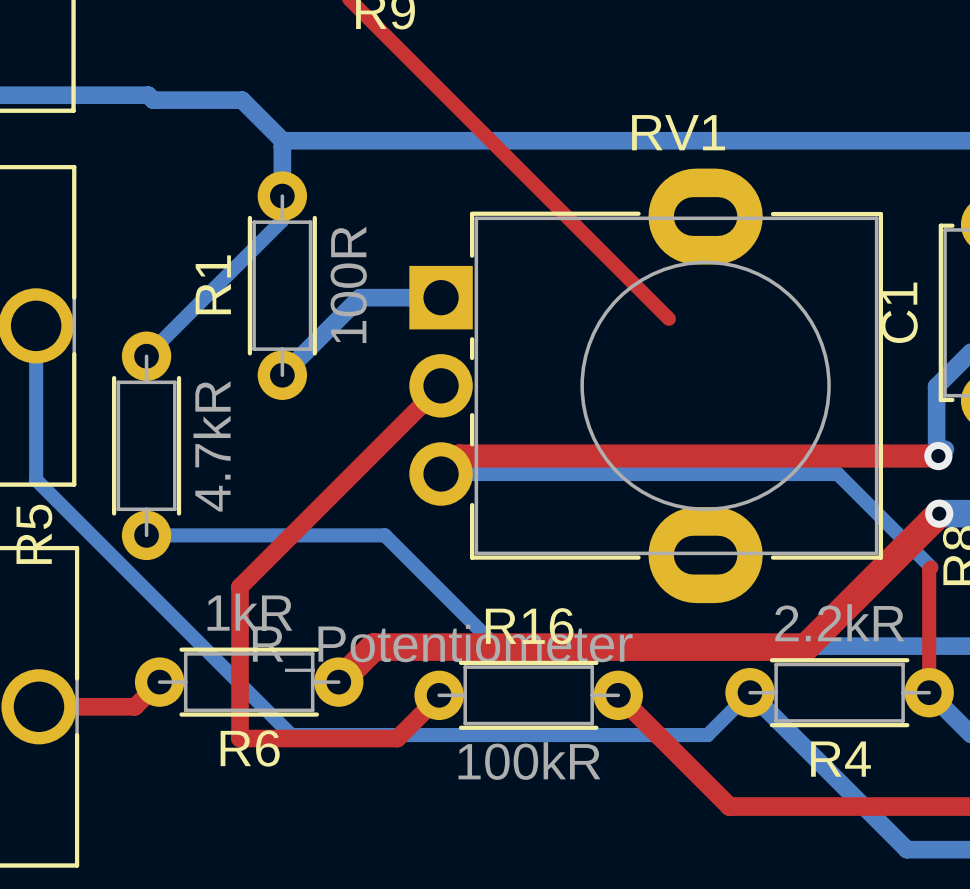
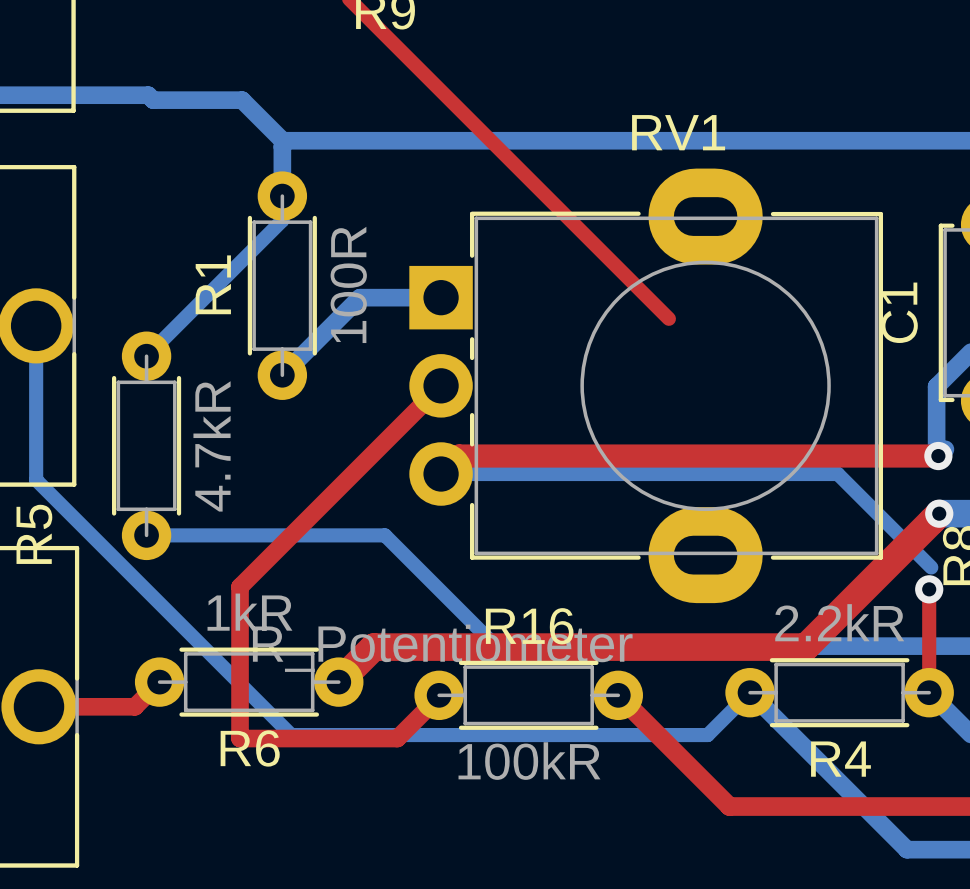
top track: (931, 567) (929, 569) (929, 589) -> none
via: none -> (929, 589)

